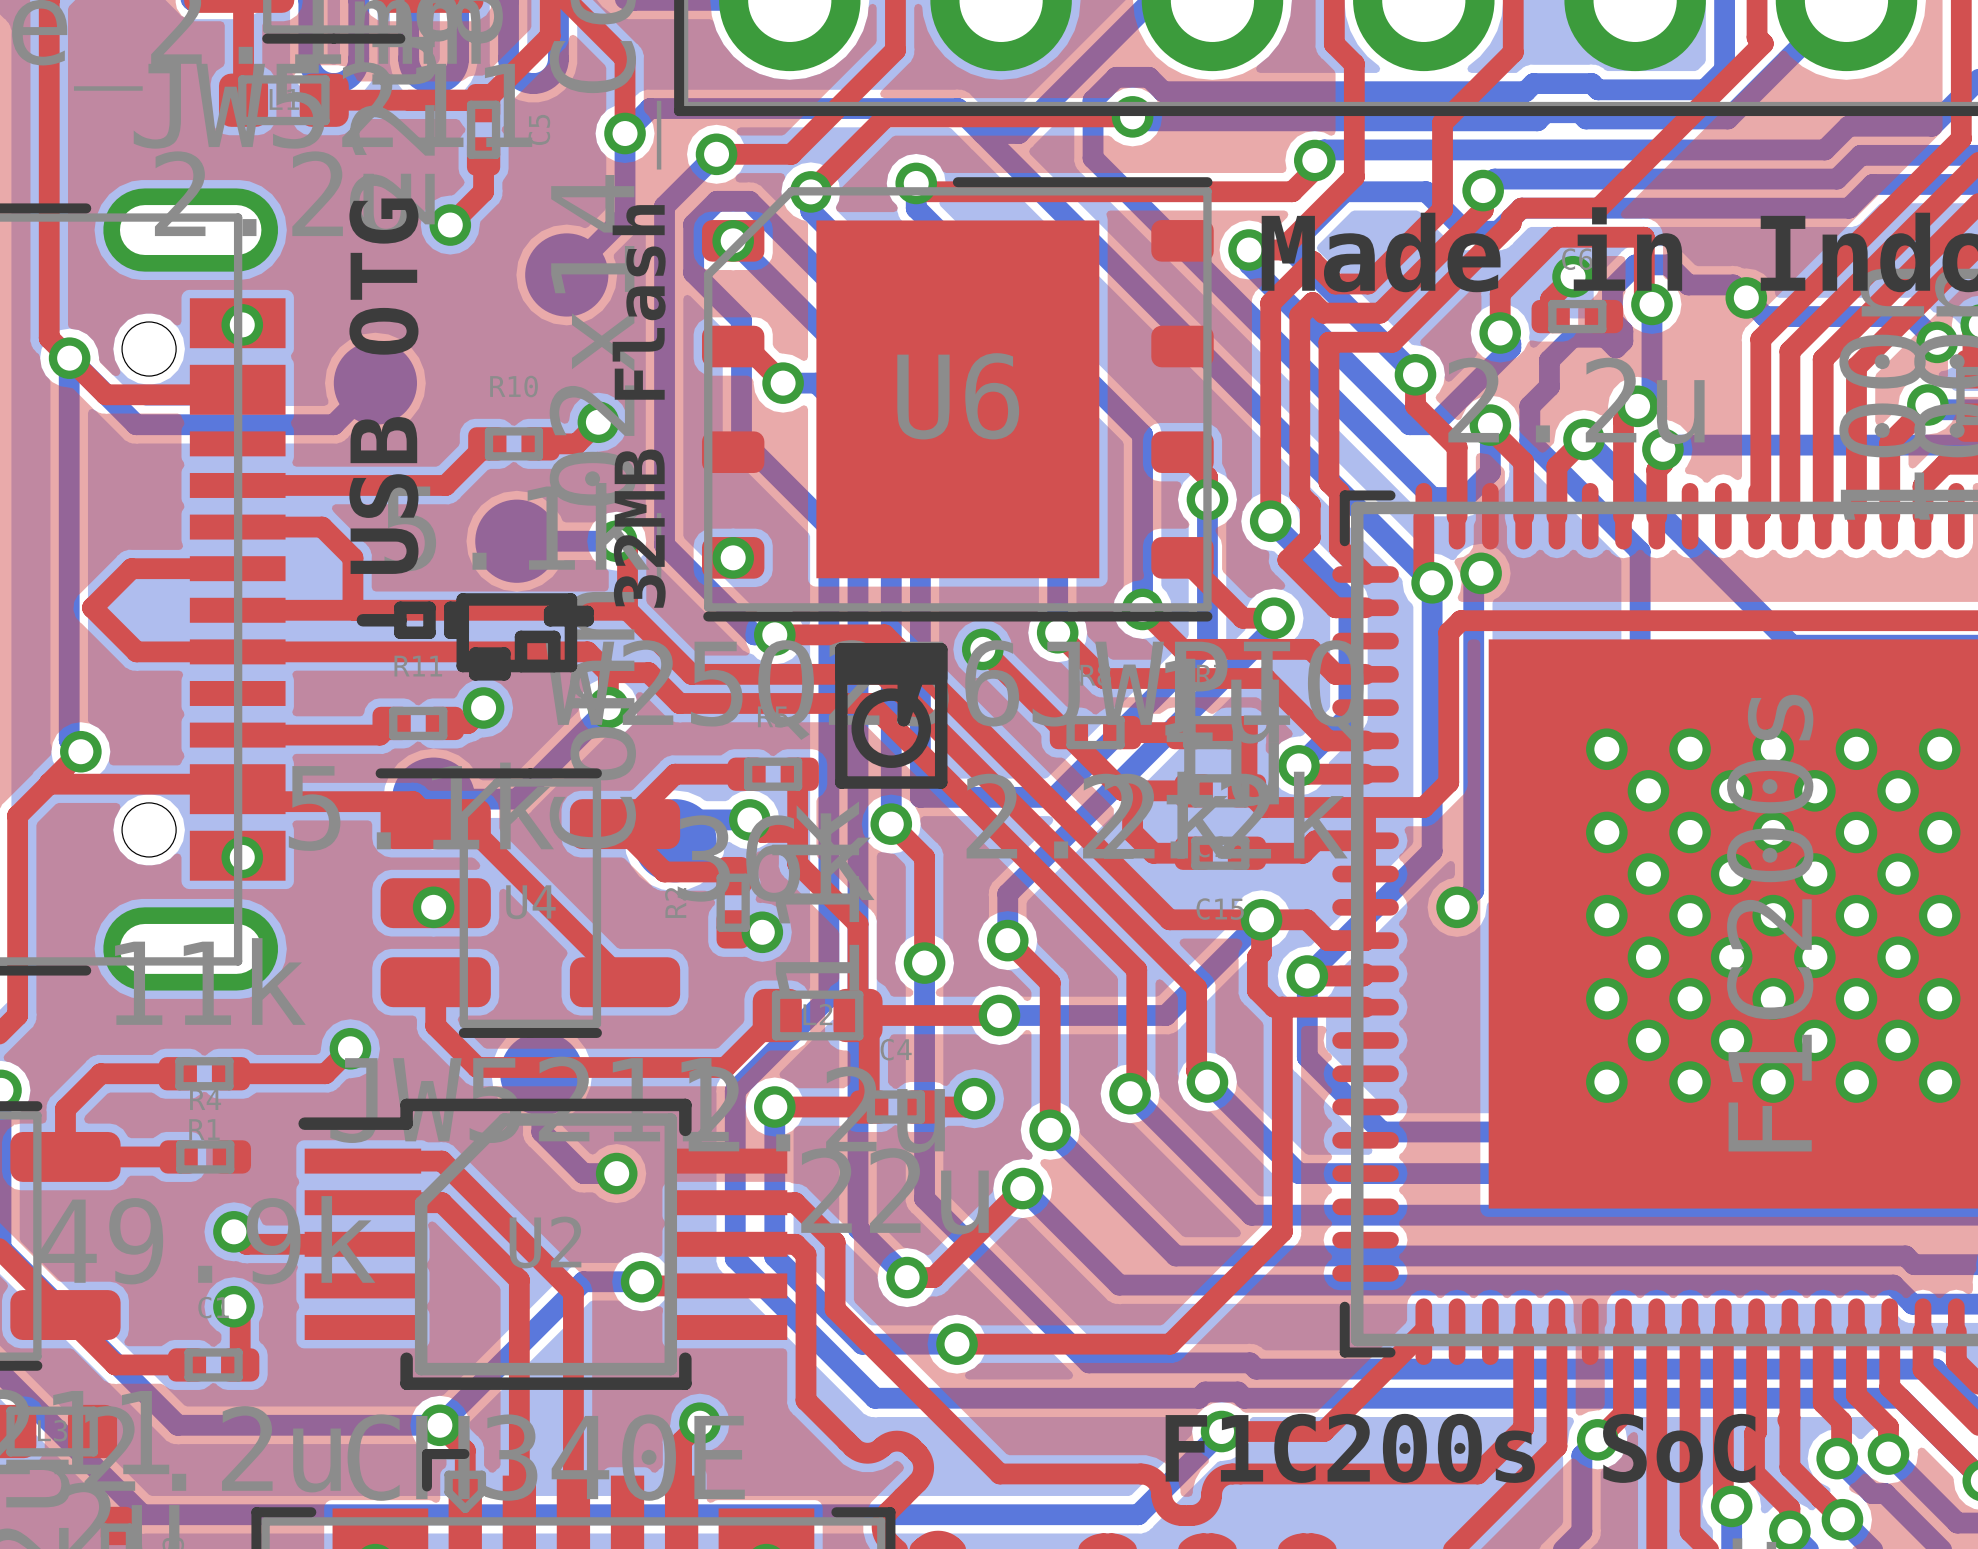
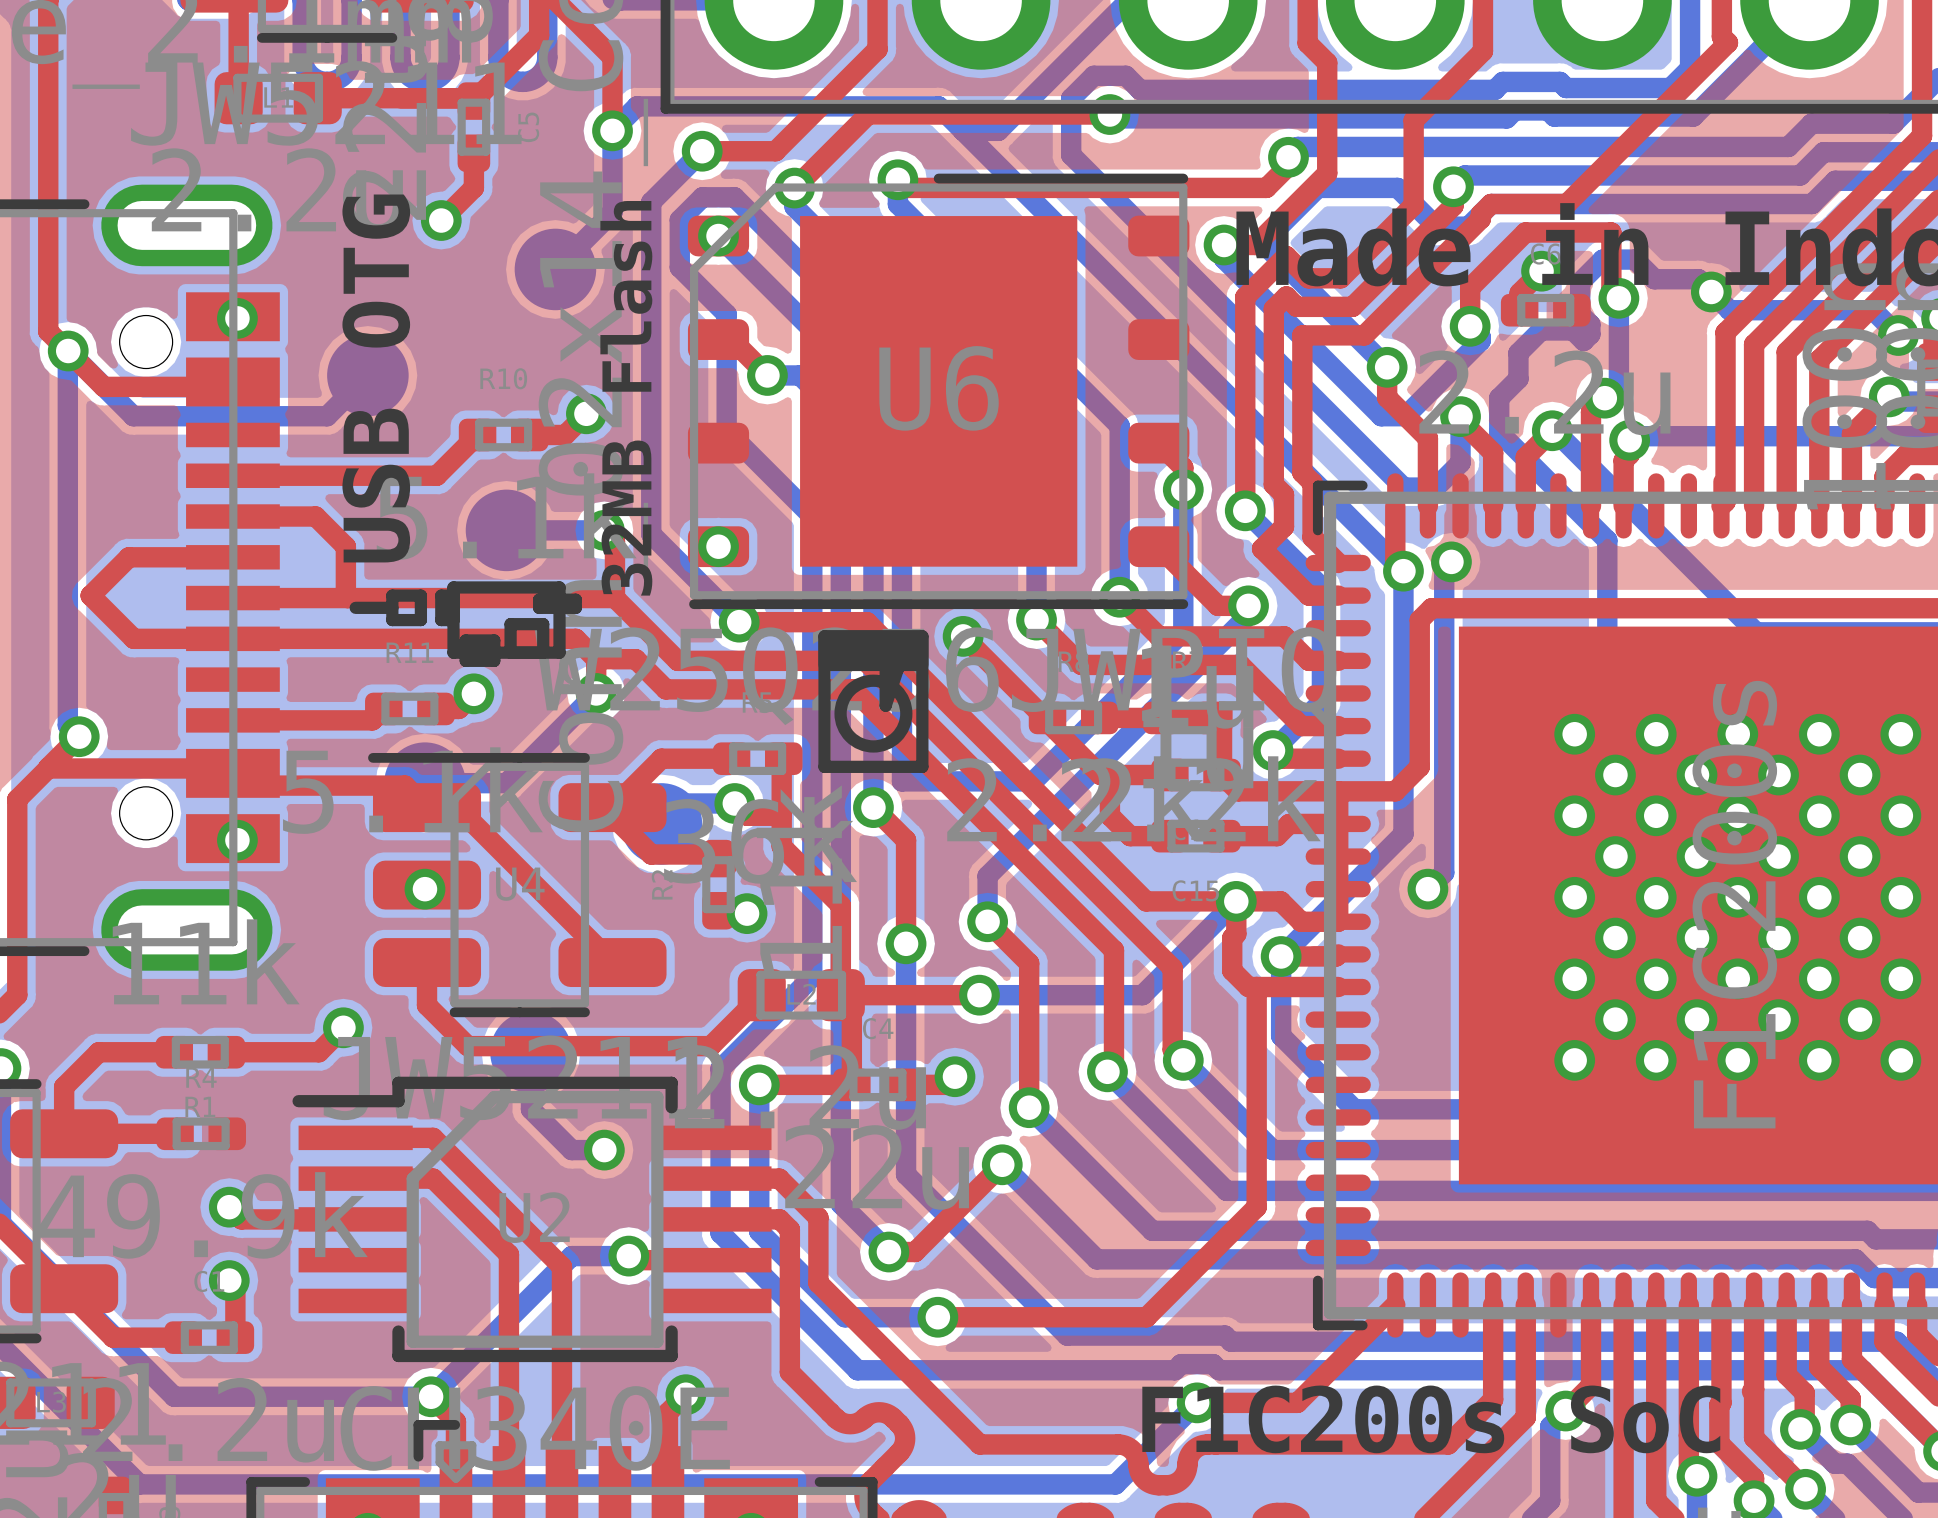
via position: (774, 634) -> (739, 622)

